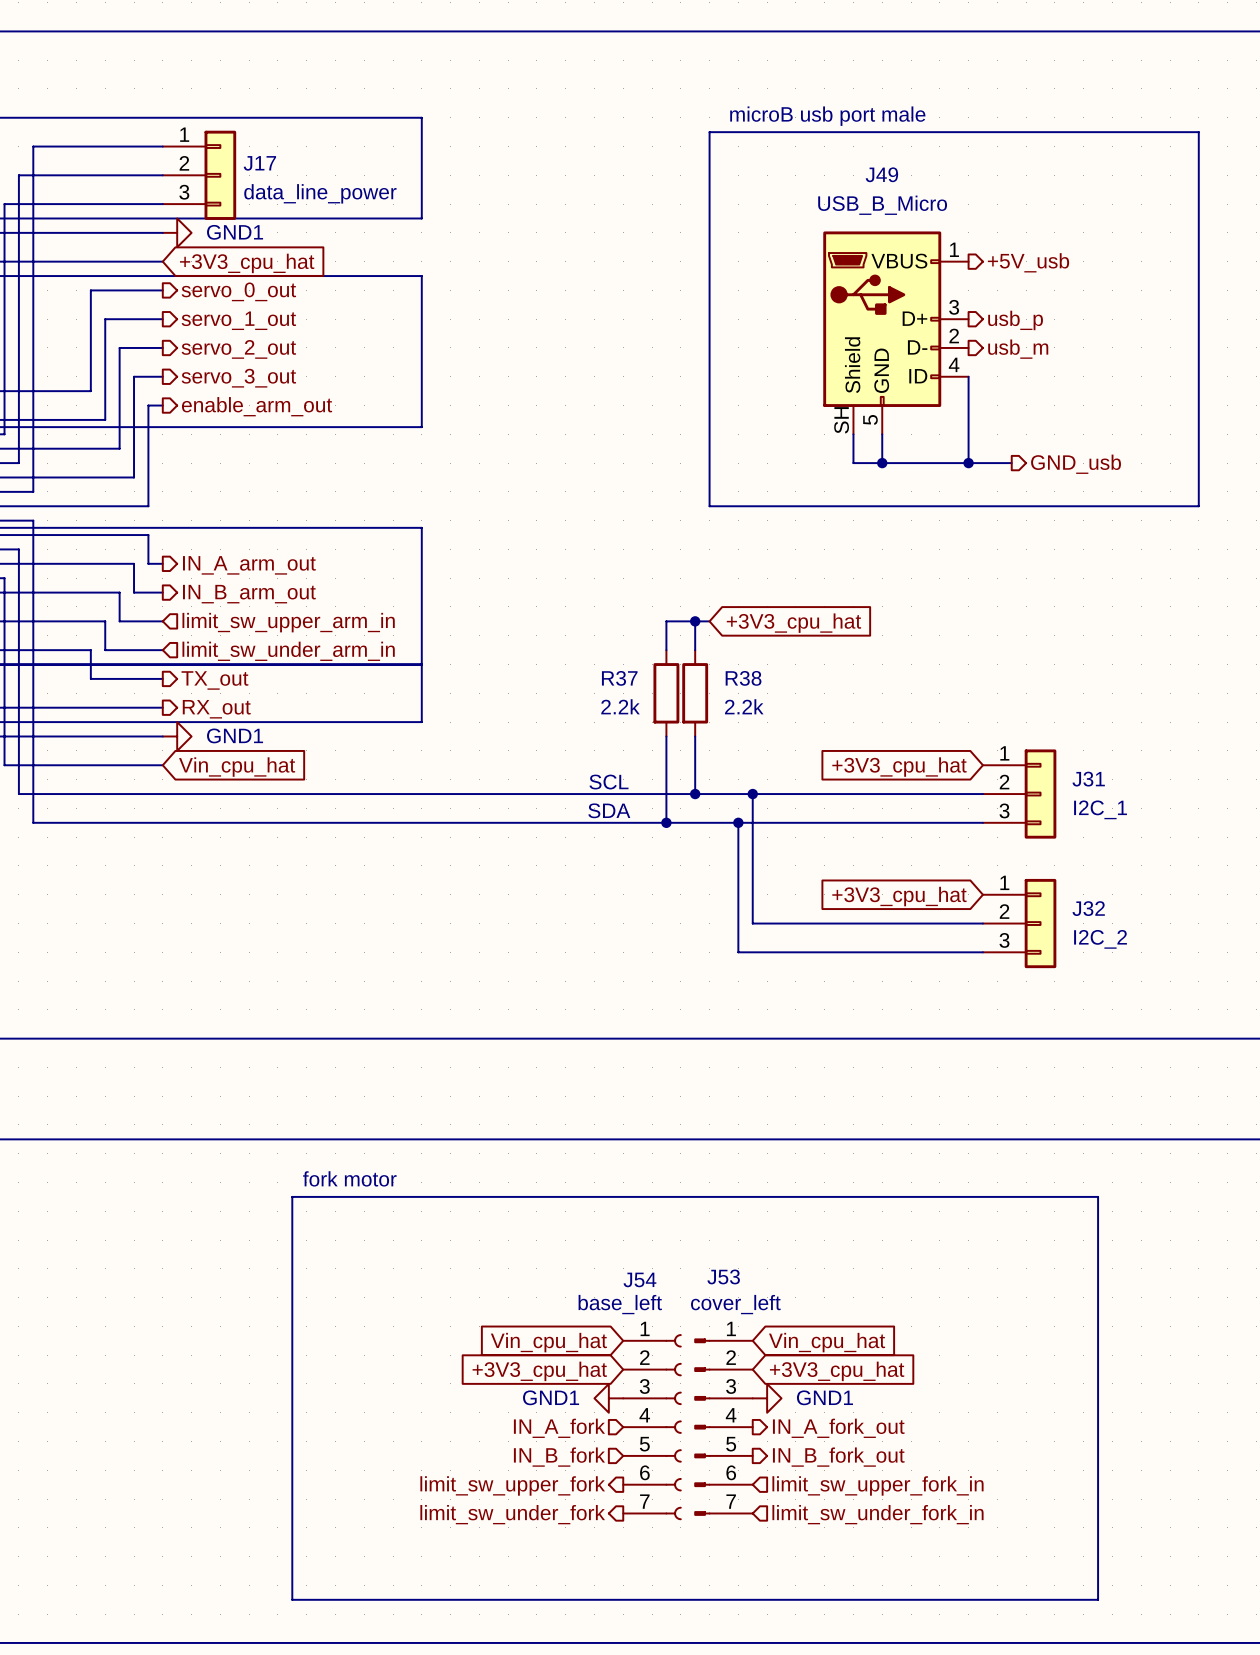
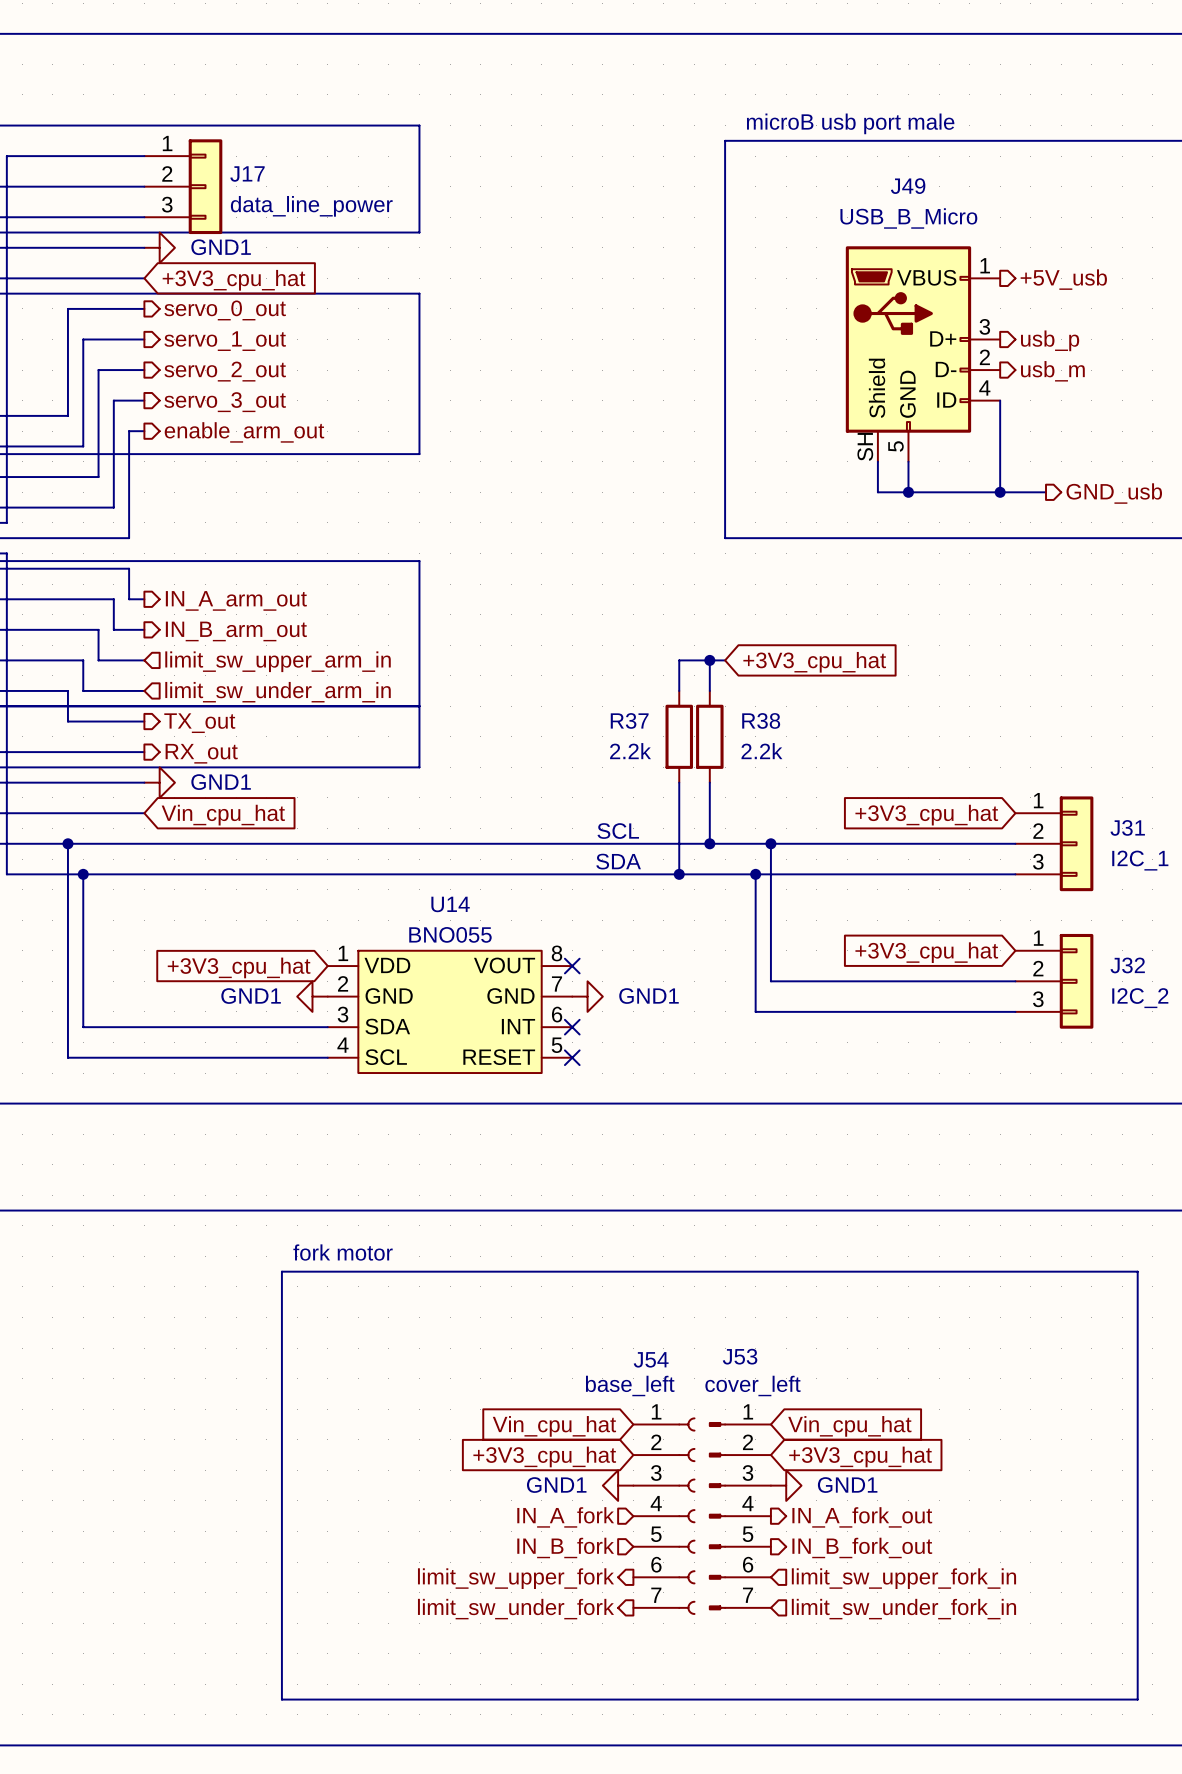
wire: none -> (67, 843) (67, 1057) (327, 1057)
junction: none -> (67, 843)
wire: none -> (83, 874) (83, 1027) (327, 1027)
junction: none -> (83, 874)
no-connect mark: none -> (572, 966)
global label: none -> +3V3_cpu_hat (239, 967)
power symbol: none -> GND1 (312, 996)
power symbol: none -> GND1 (587, 996)
U14: none -> BNO055 (450, 1011)
no-connect mark: none -> (572, 1027)
no-connect mark: none -> (572, 1057)

